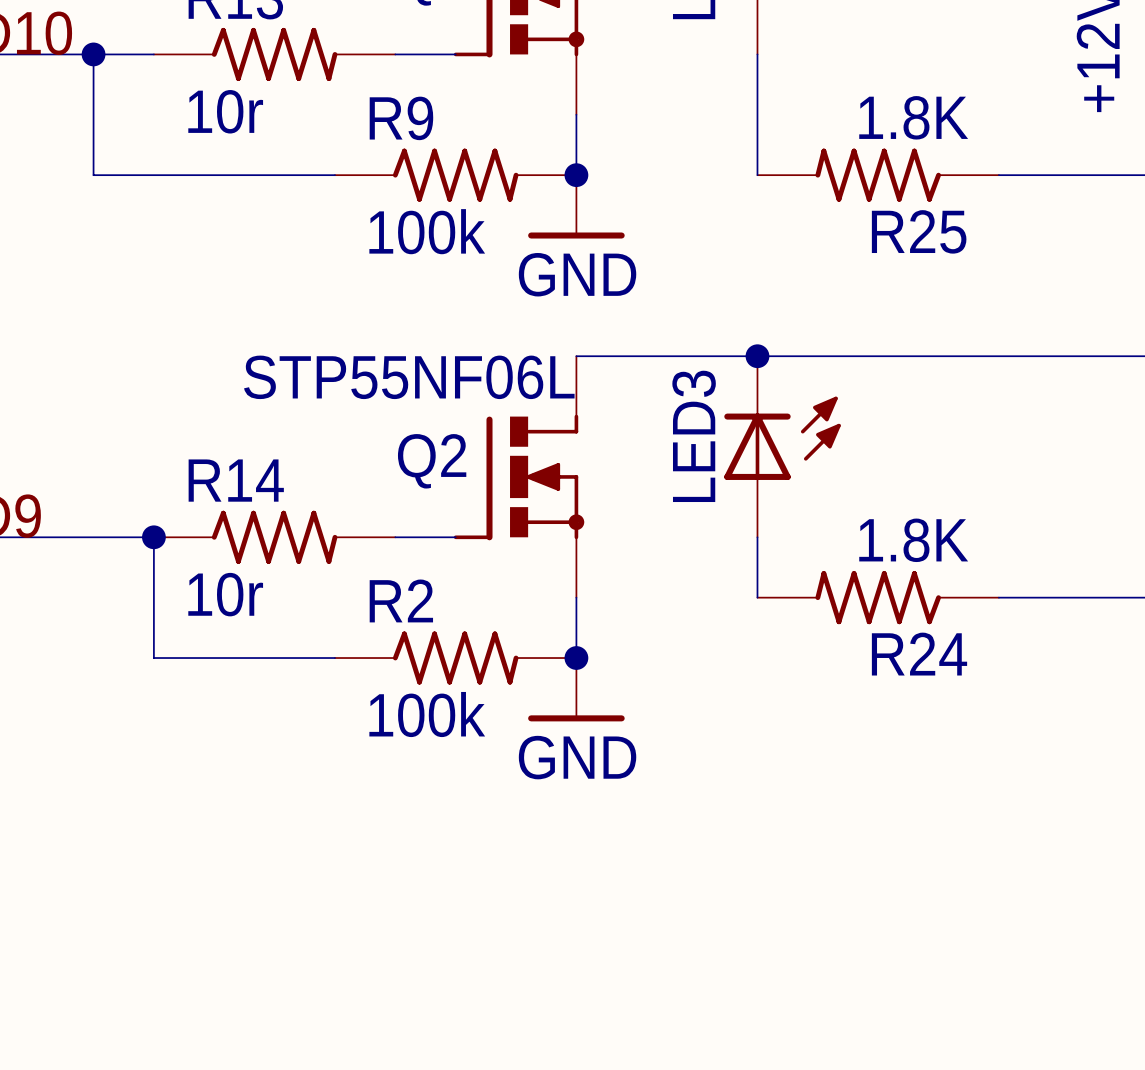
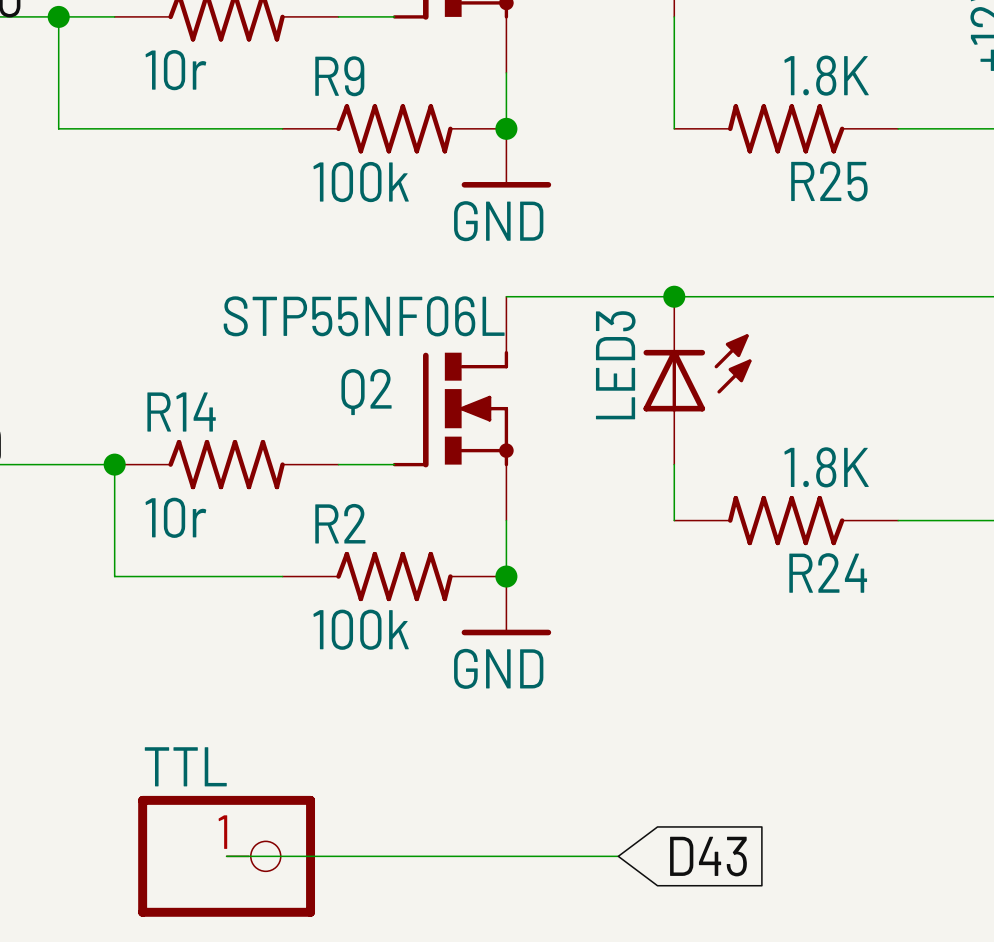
wire: none -> (226, 856) (618, 856)
TTL: none -> (226, 856)
global label: none -> D43 (708, 856)

